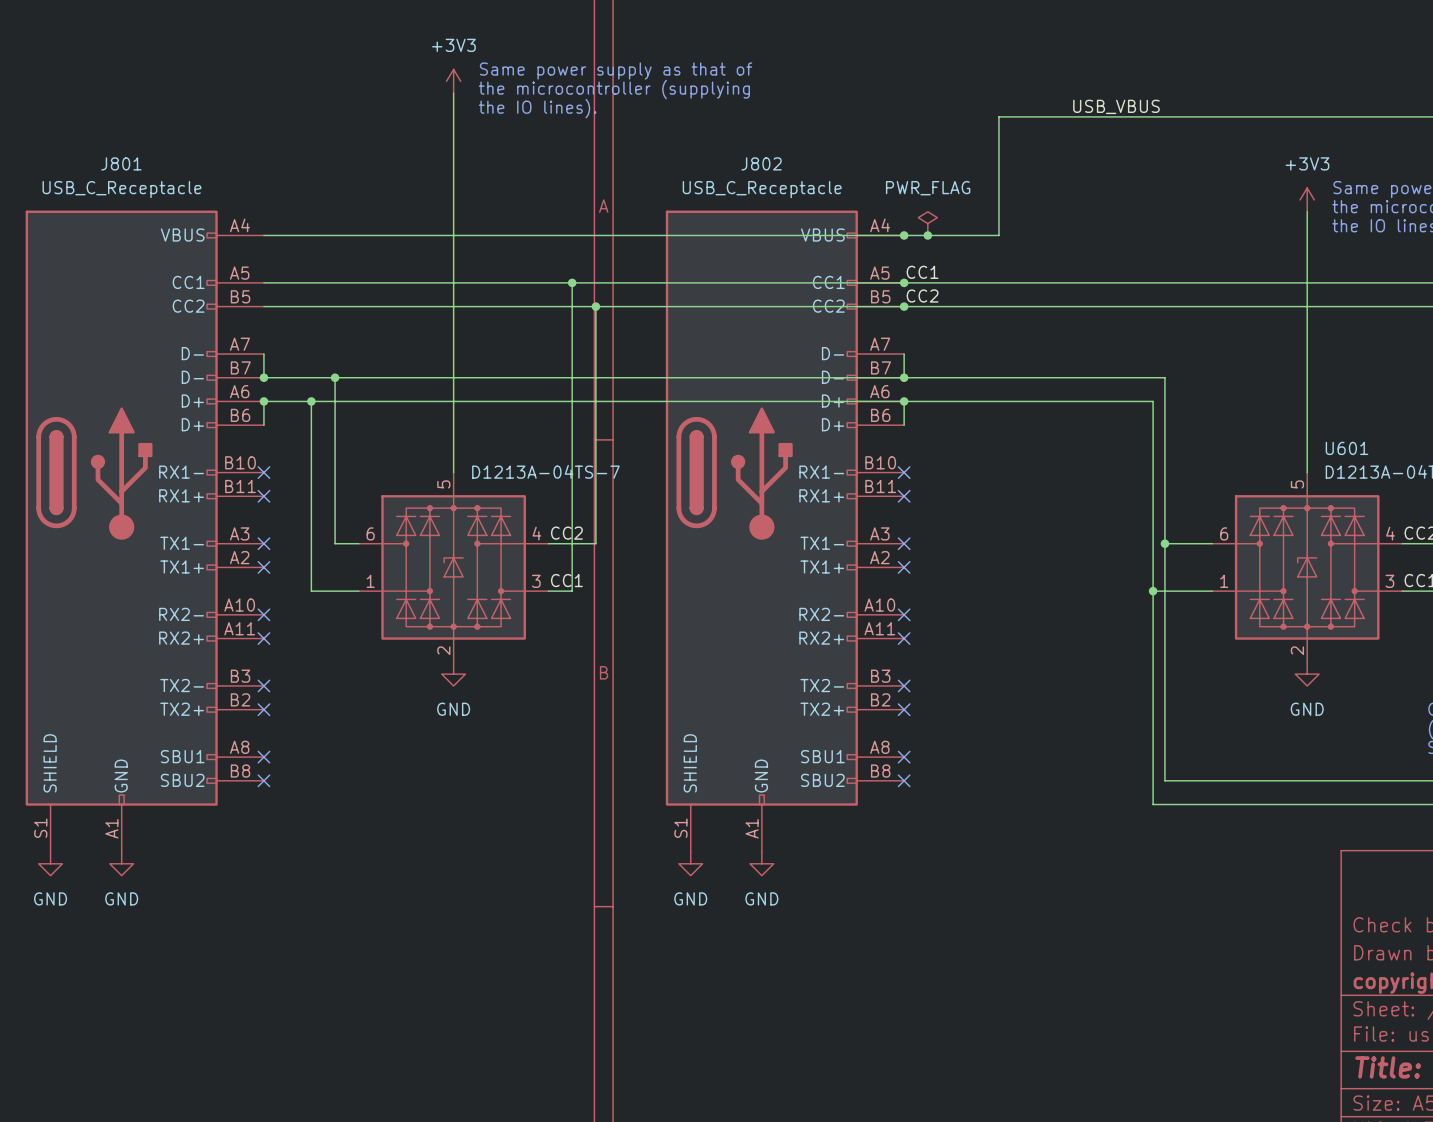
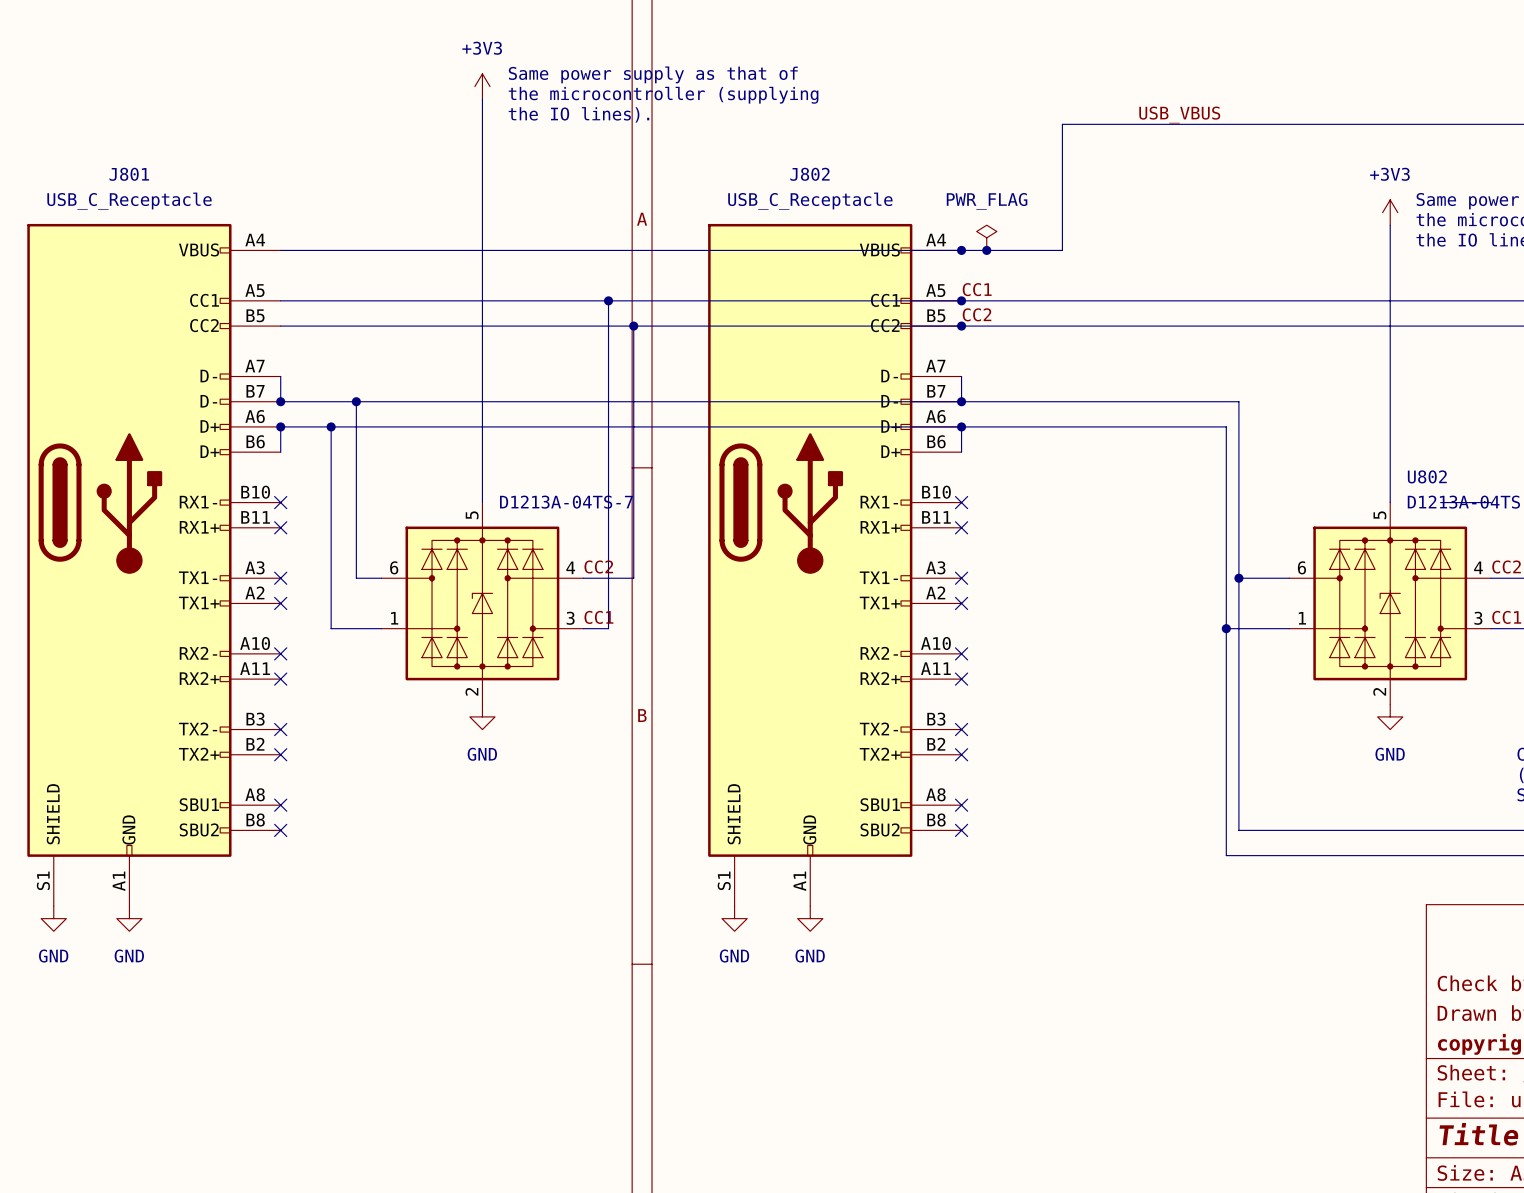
U601 name: U601 (1346, 448) -> U802 (1427, 476)
wire: none -> (1440, 502) (1491, 502)

